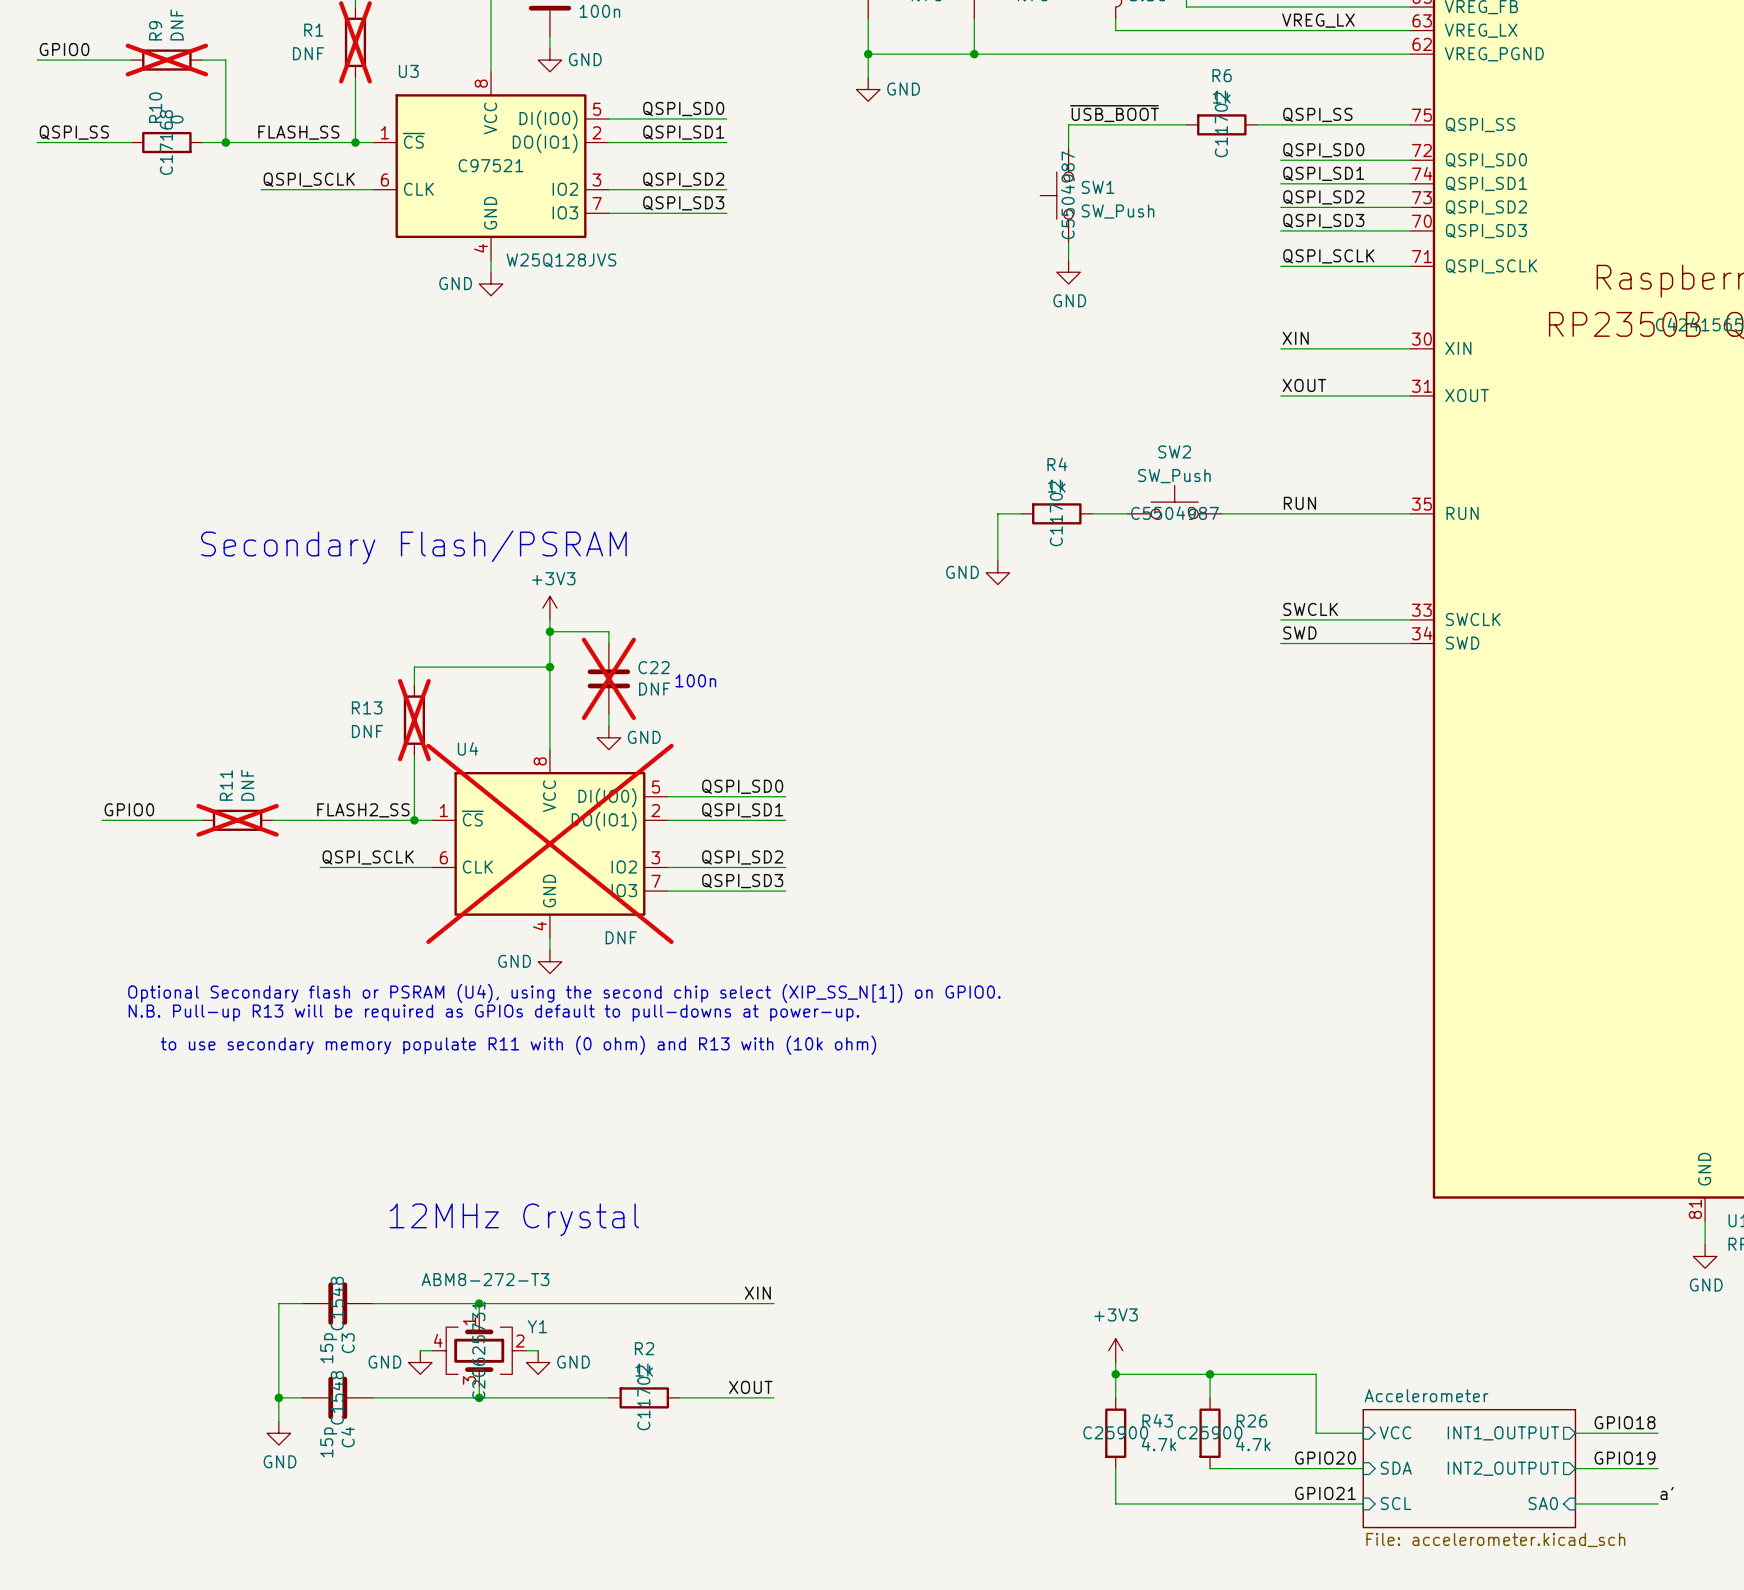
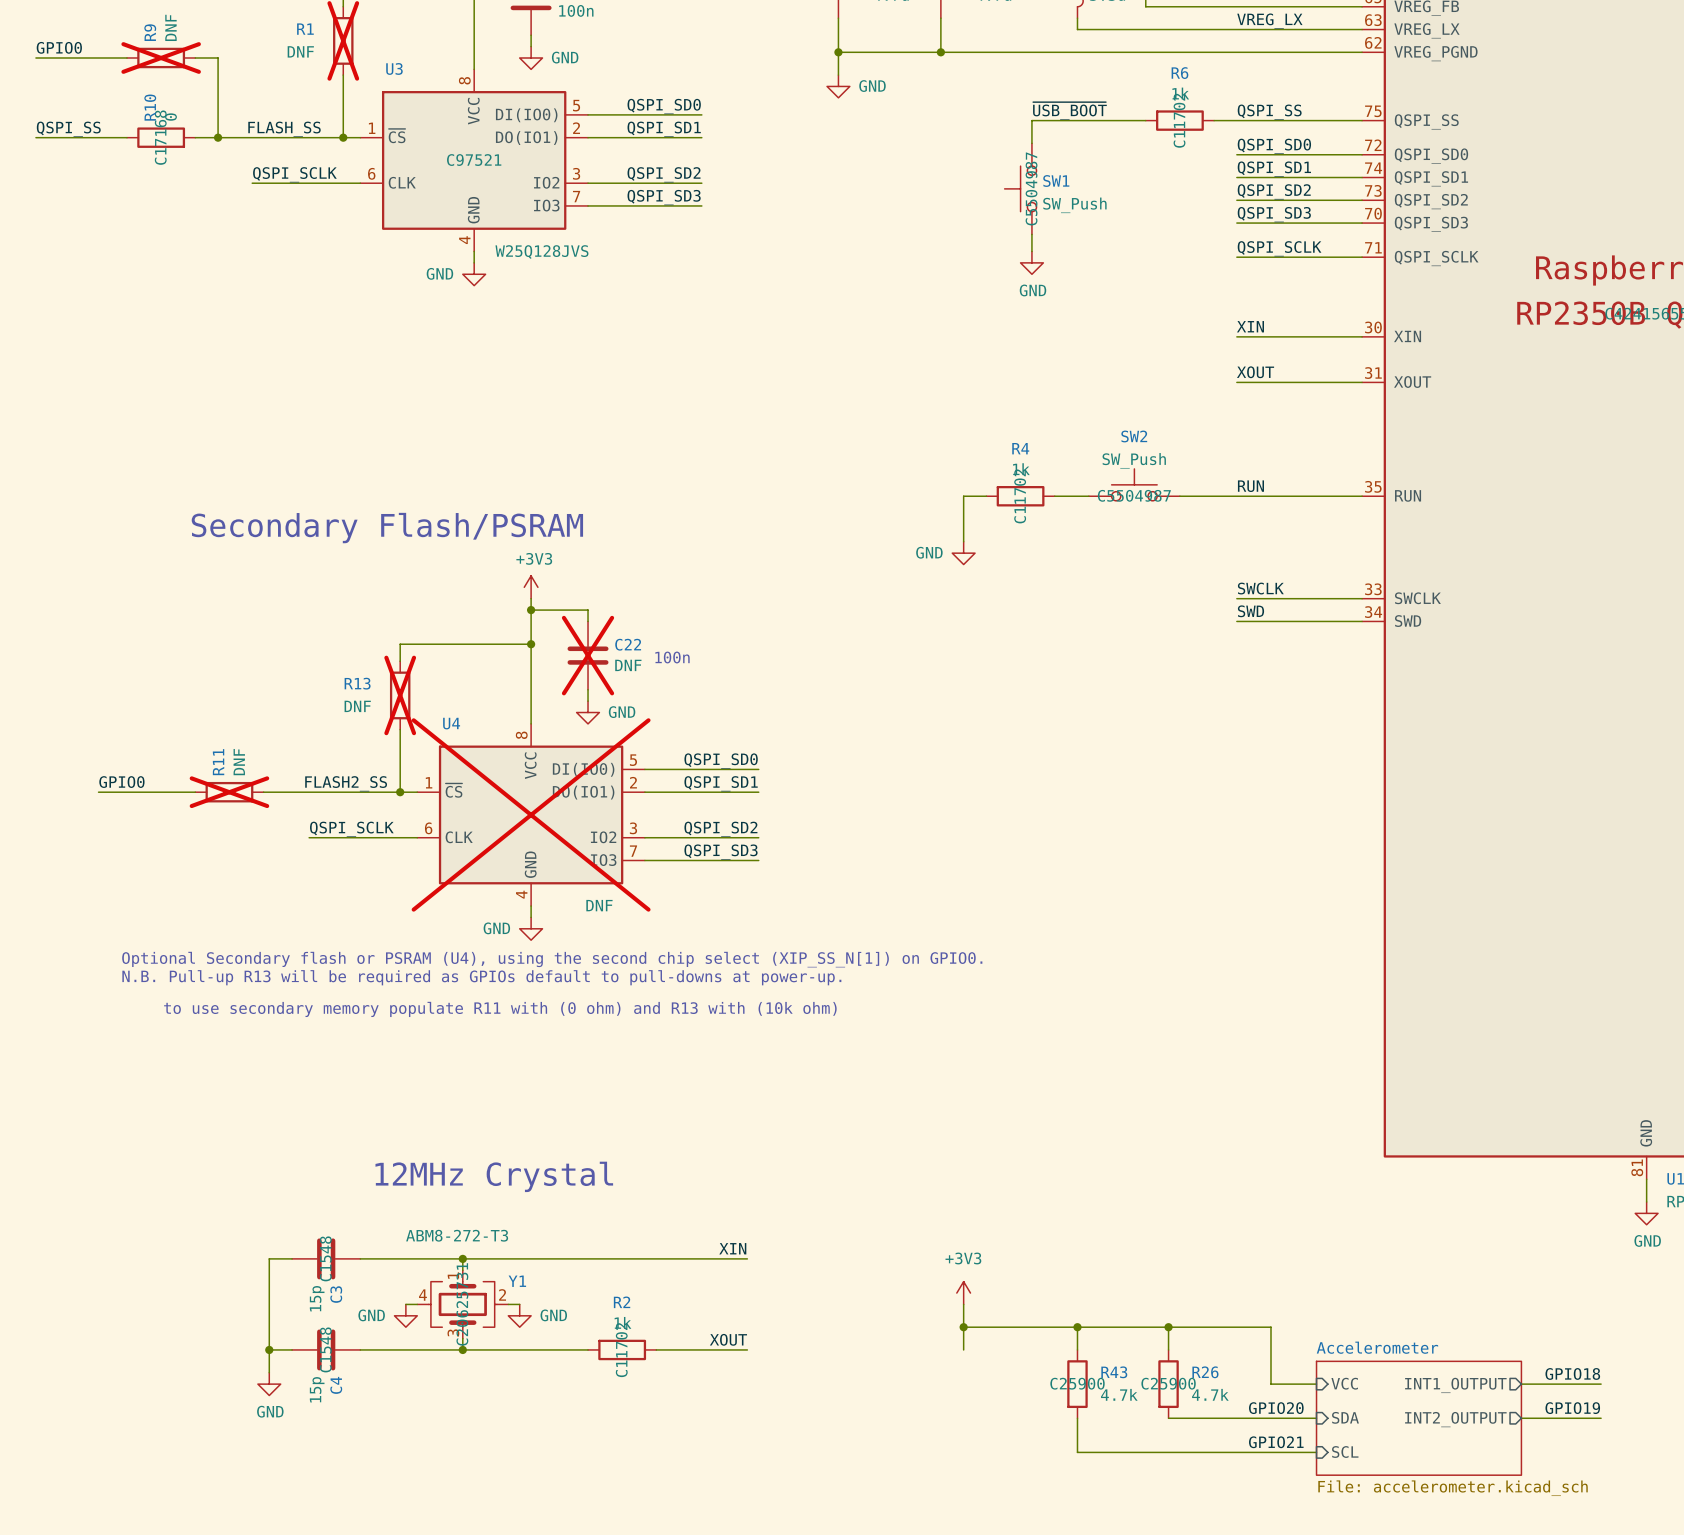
wire: none -> (963, 1304) (963, 1349)
power symbol position: +3V3 (1115, 1350) -> +3V3 (963, 1293)
wire: (1115, 1362) (1115, 1374) -> (963, 1327) (1077, 1327)
junction: none -> (963, 1327)
label: a' (1667, 1493) -> none
sheet pin: SA0 (1543, 1503) -> none
wire: (1575, 1503) (1657, 1503) -> none

